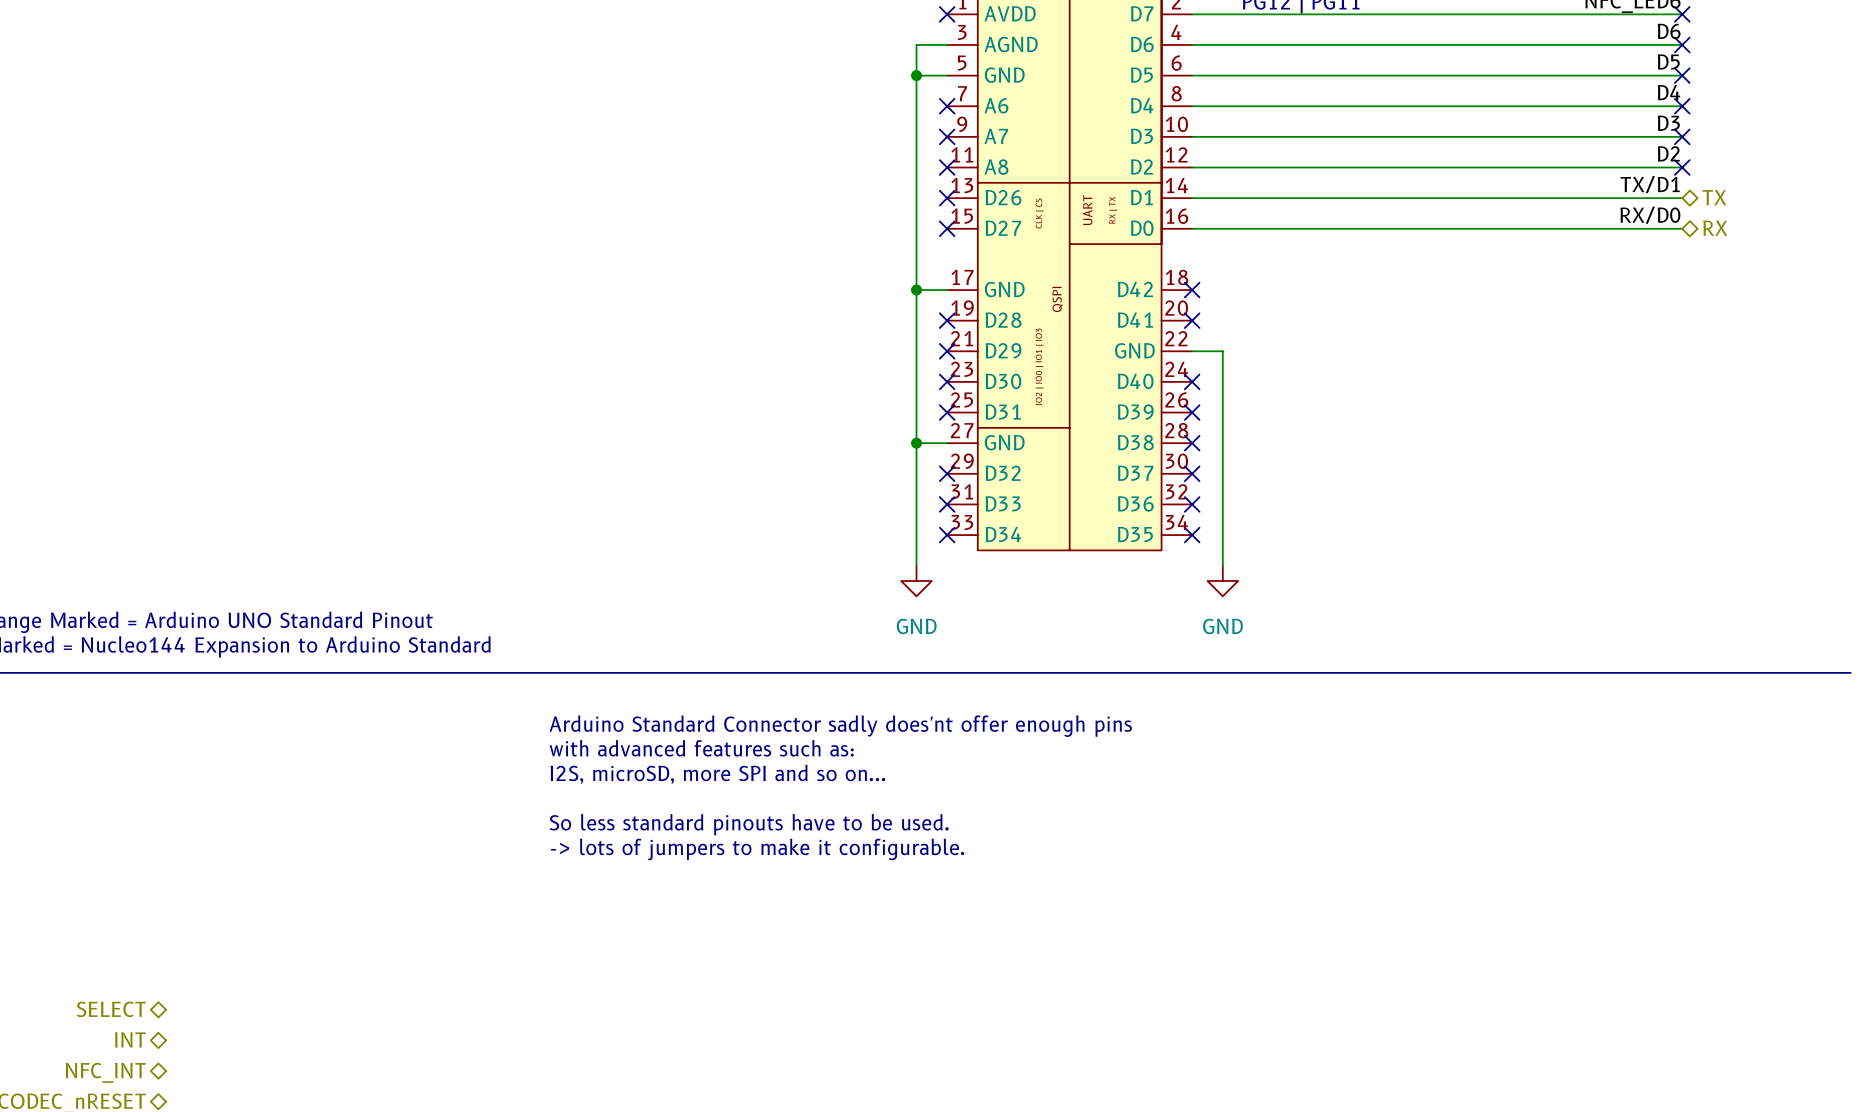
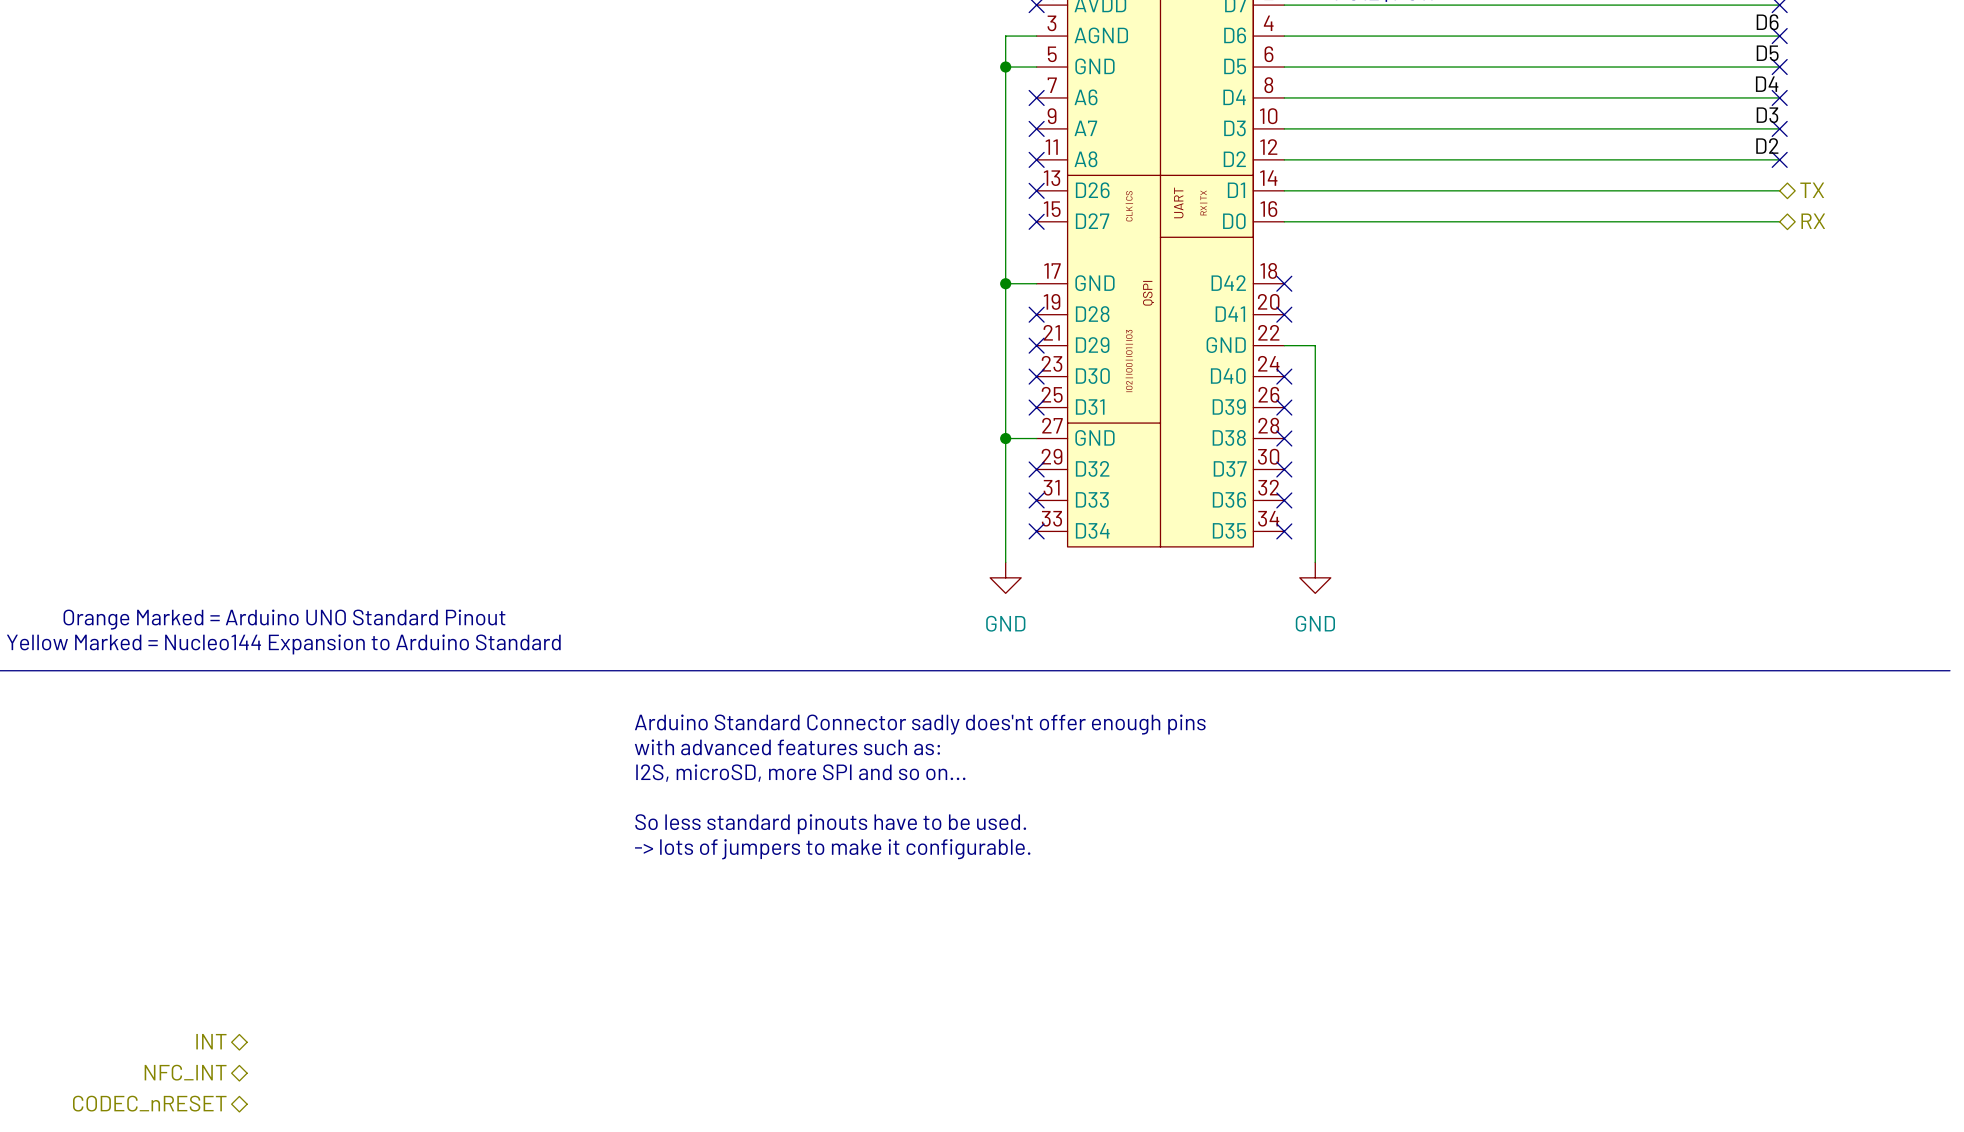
label: TX/D1 (1650, 184) -> none
label: RX/D0 (1650, 215) -> none
hierarchical label: SELECT (111, 1009) -> none

